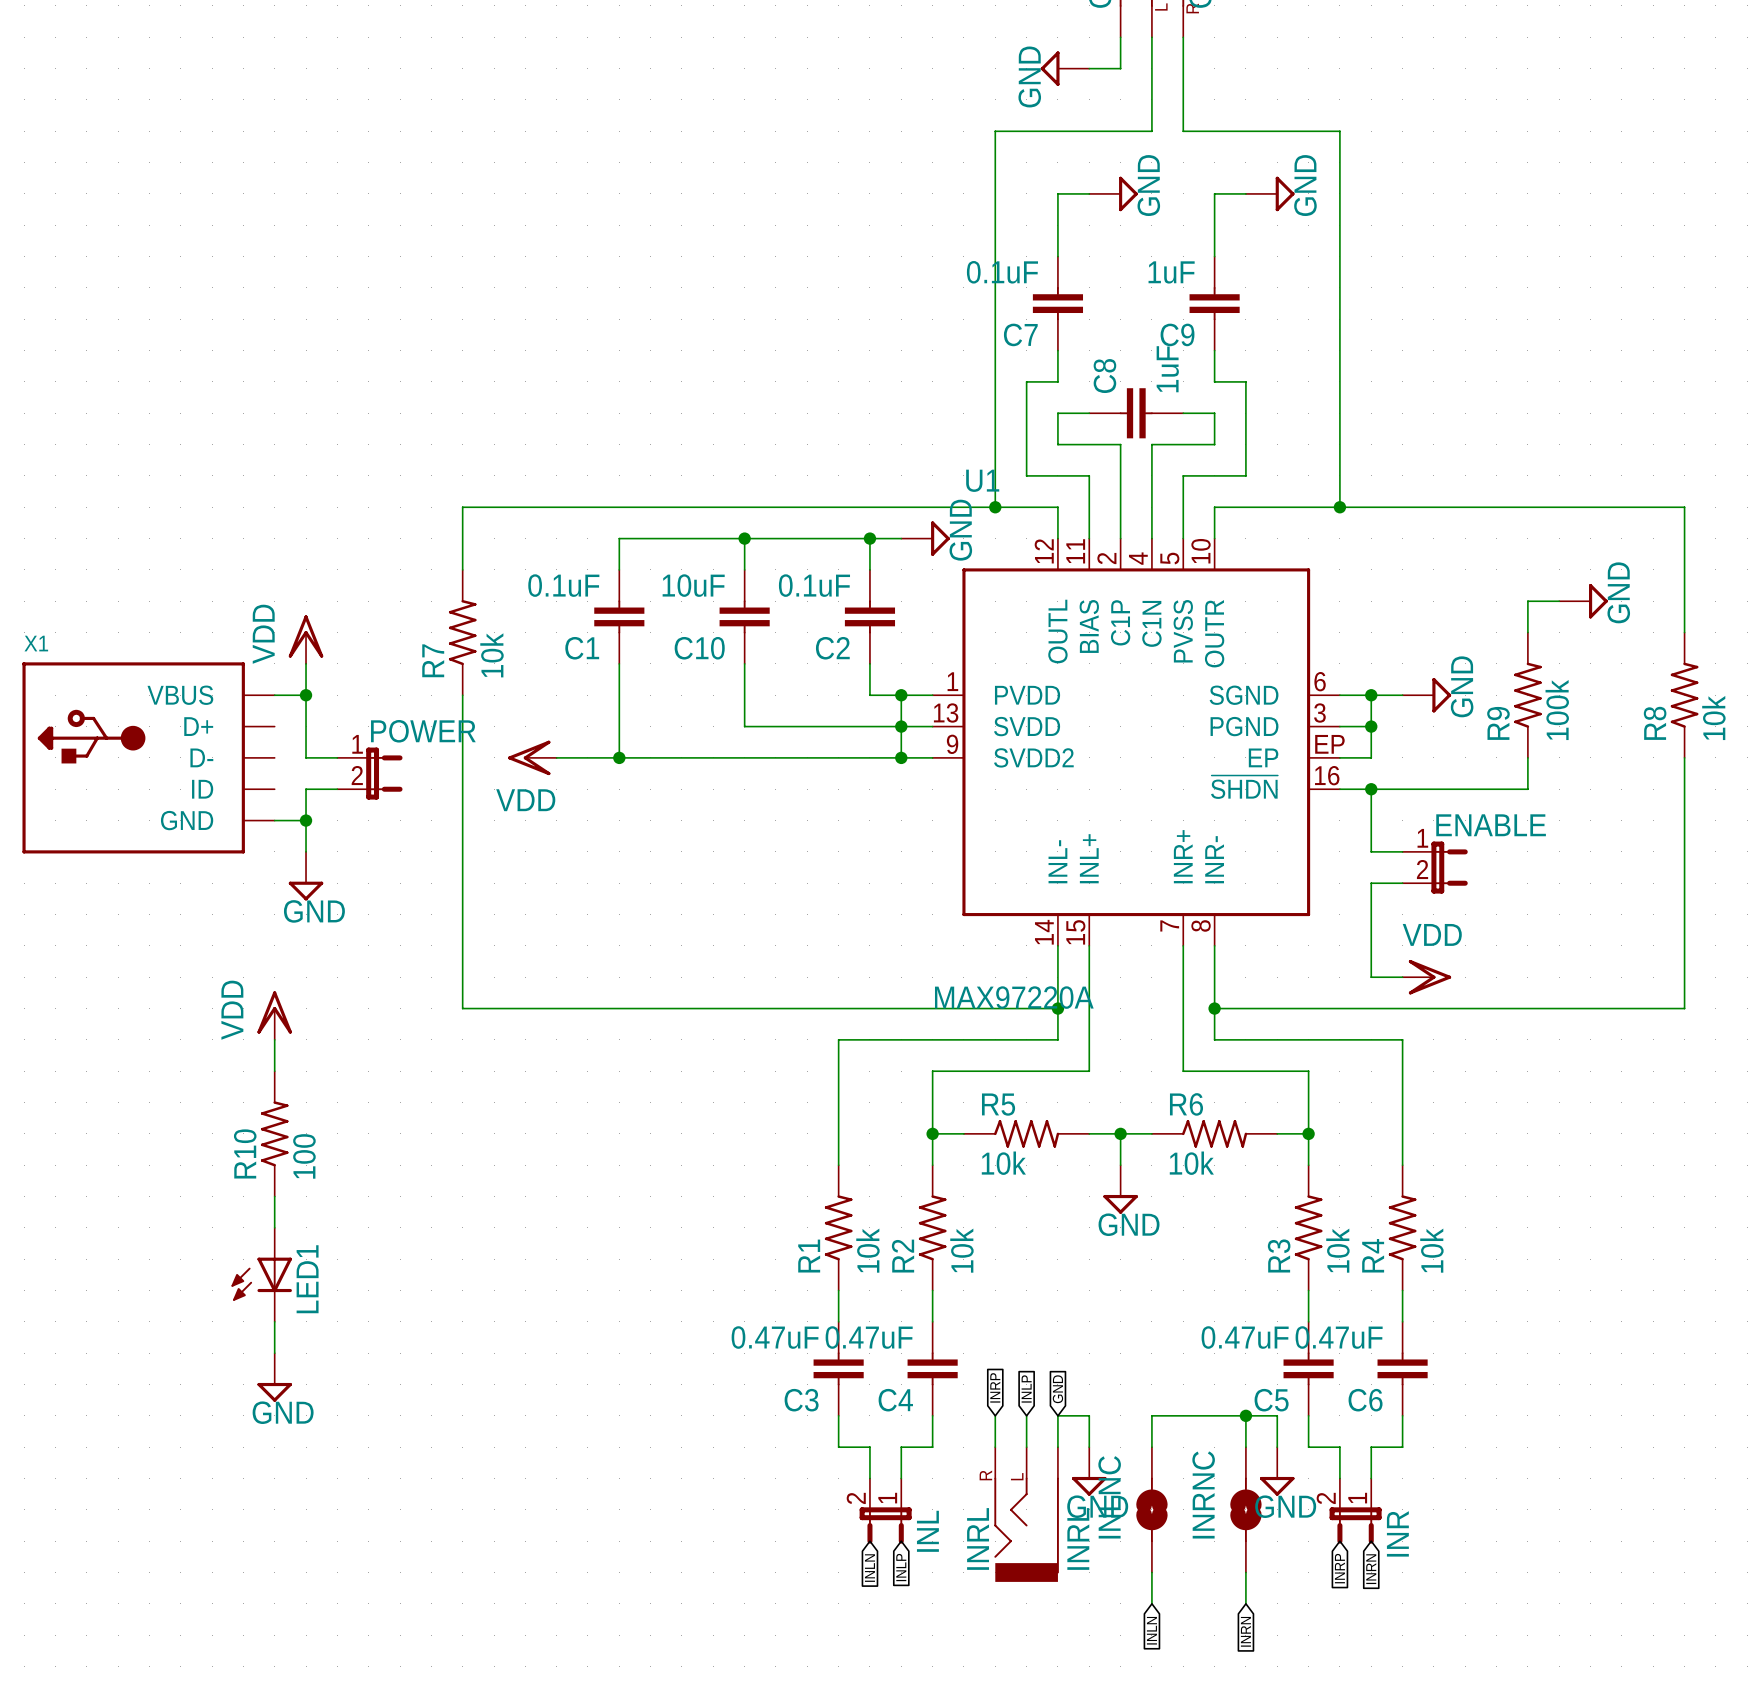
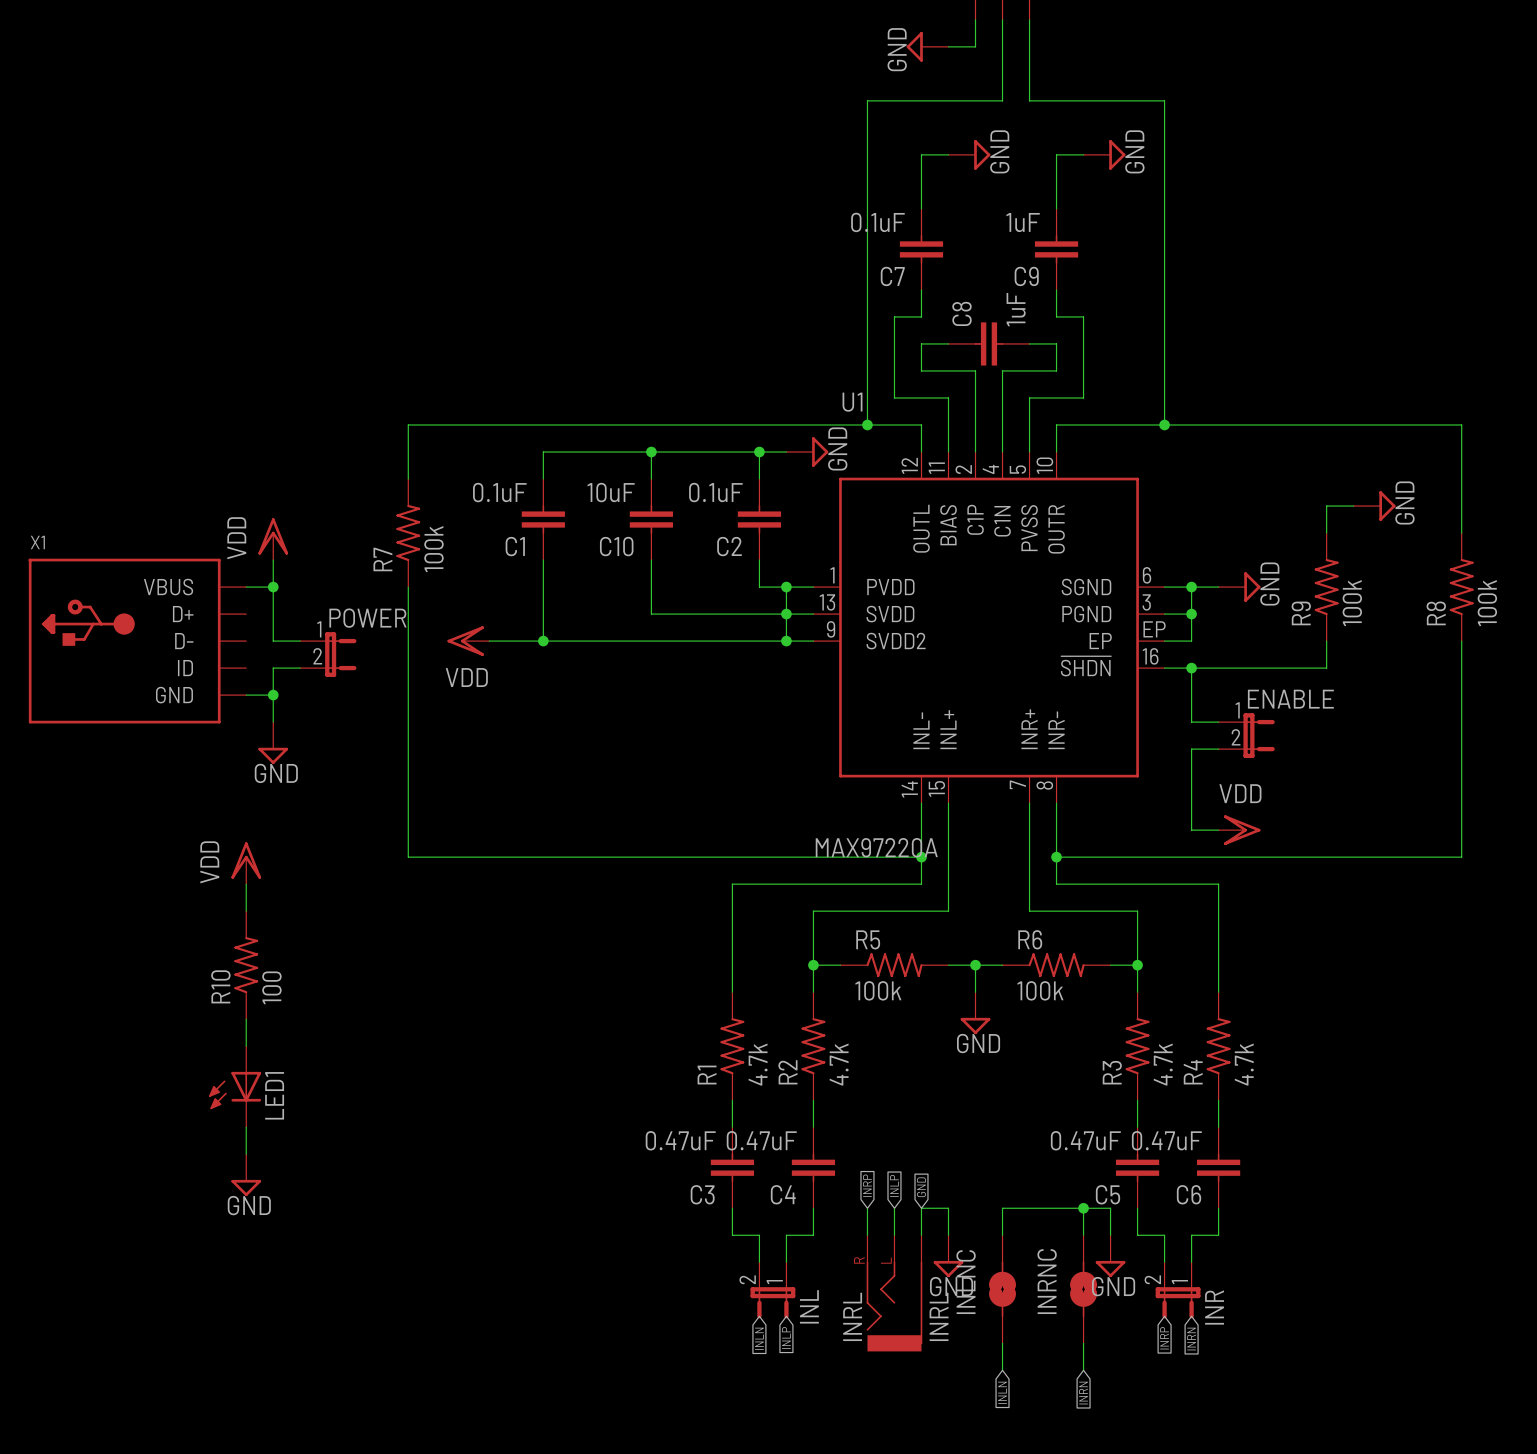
R7 value: 10k (492, 655) -> 100k (433, 549)
R8 value: 10k (1713, 718) -> 100k (1487, 603)
R5 value: 10k (1003, 1163) -> 100k (878, 990)
R6 value: 10k (1191, 1163) -> 100k (1040, 990)
R1 value: 10k (867, 1250) -> 4.7k (758, 1064)
R2 value: 10k (961, 1250) -> 4.7k (839, 1064)
R3 value: 10k (1337, 1250) -> 4.7k (1163, 1064)
R4 value: 10k (1431, 1250) -> 4.7k (1244, 1064)

